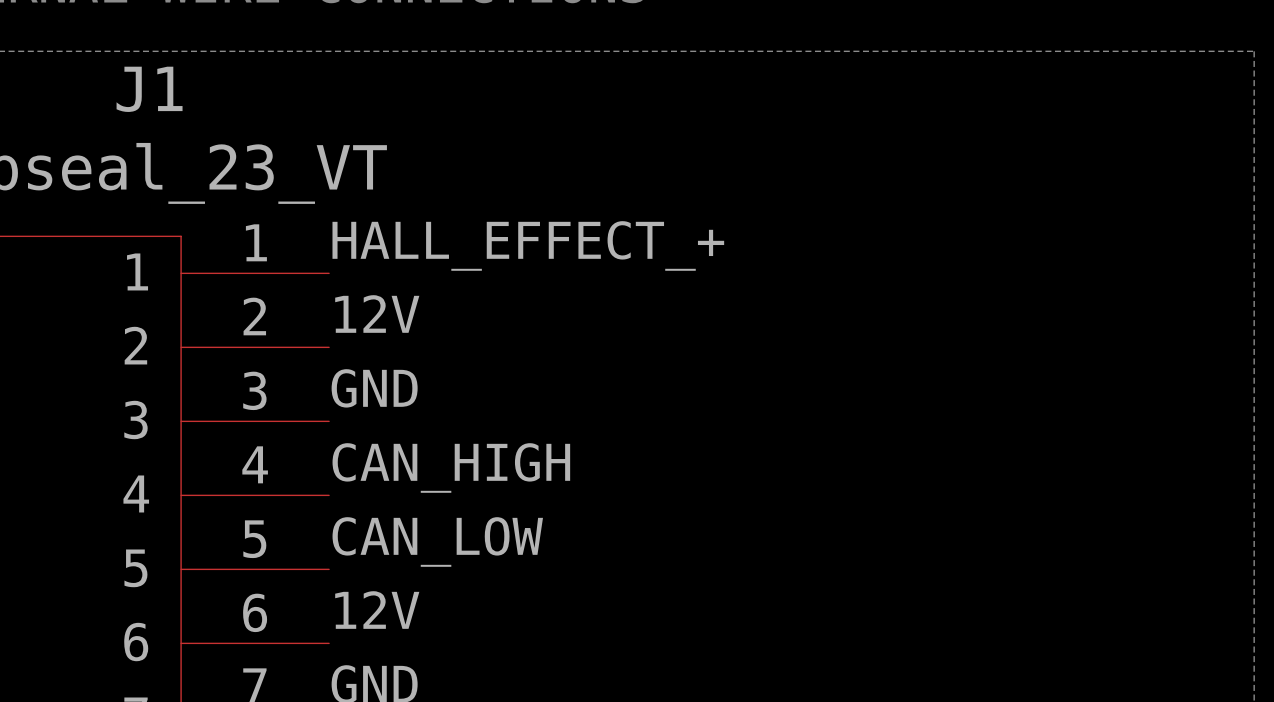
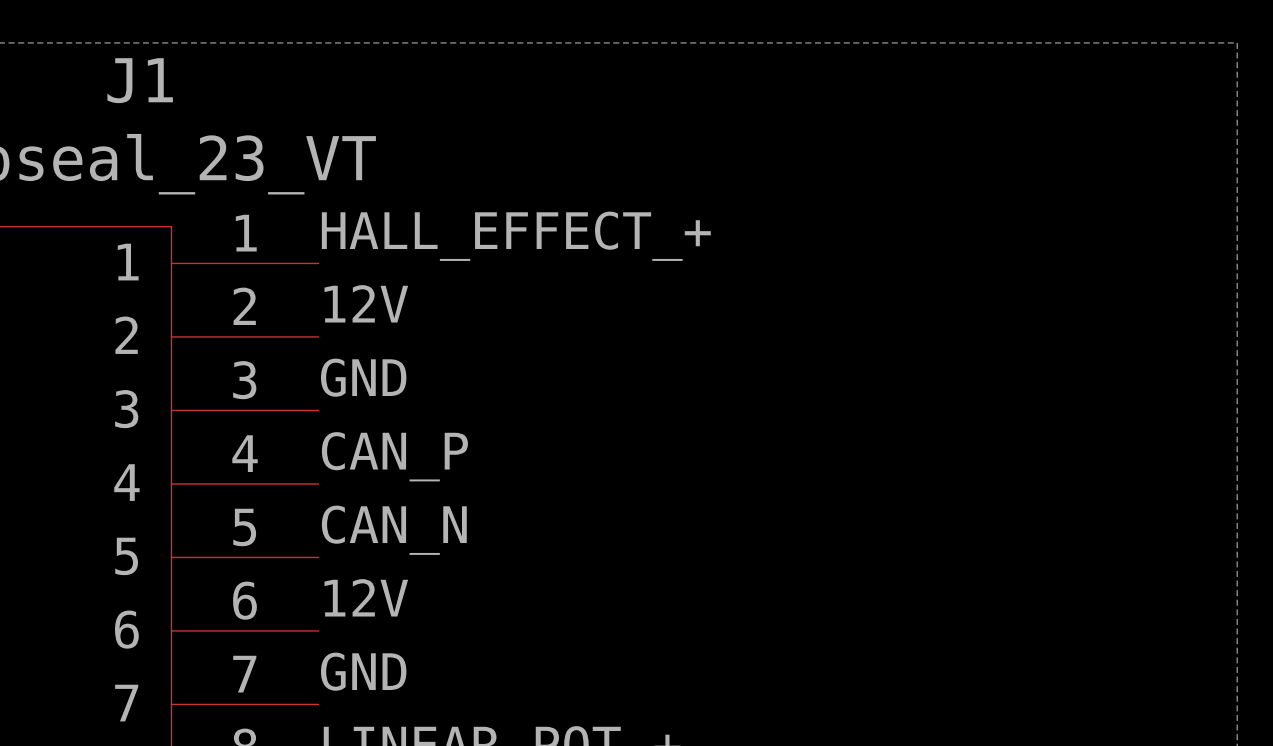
label: CAN_HIGH (451, 467) -> CAN_P (394, 456)
label: CAN_LOW (437, 542) -> CAN_N (394, 530)

